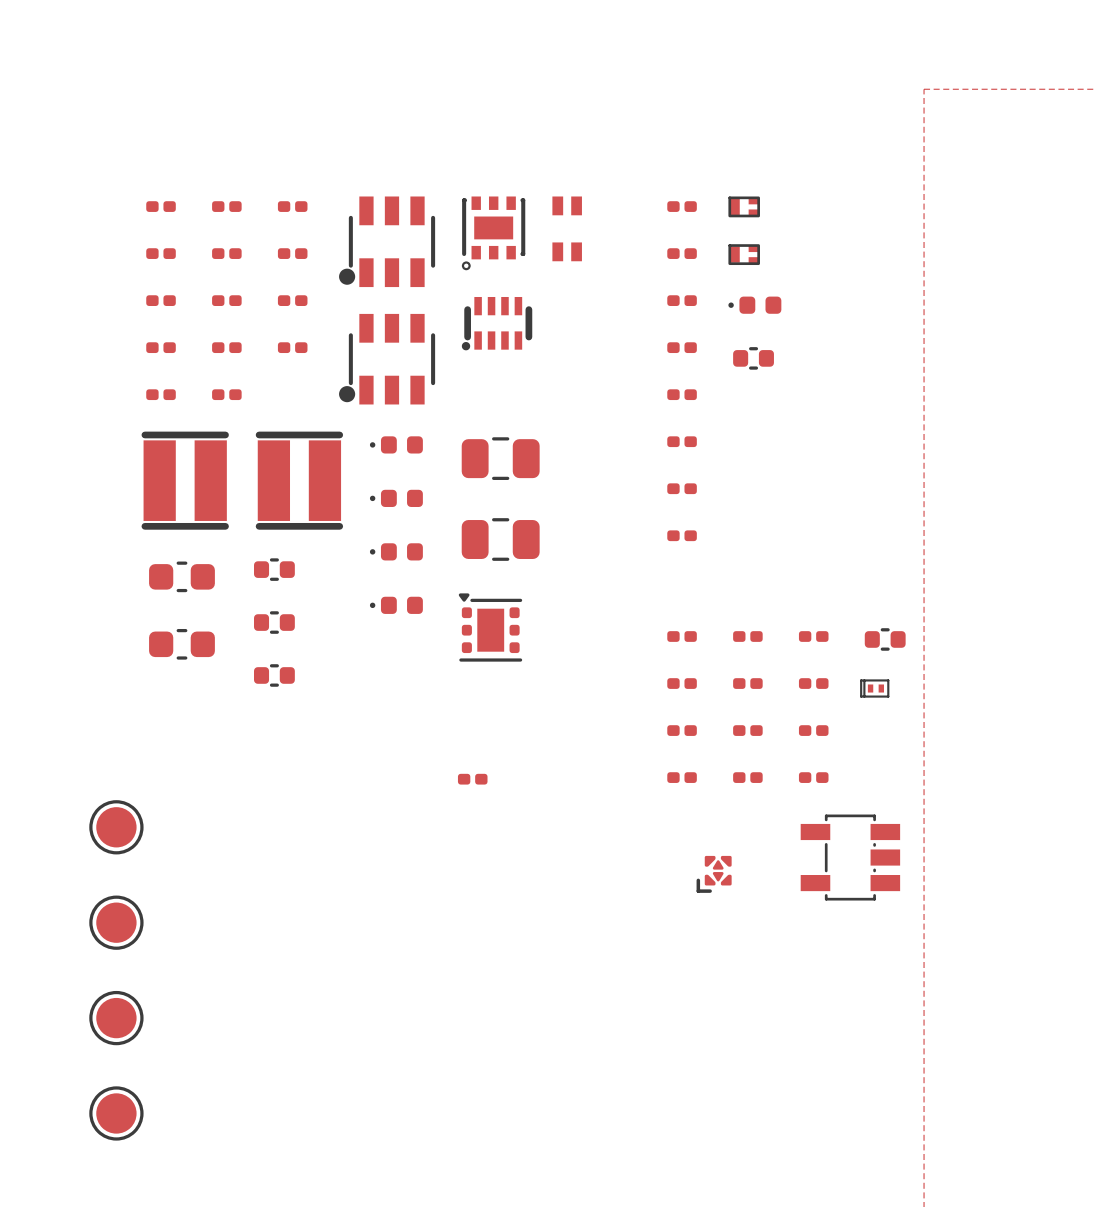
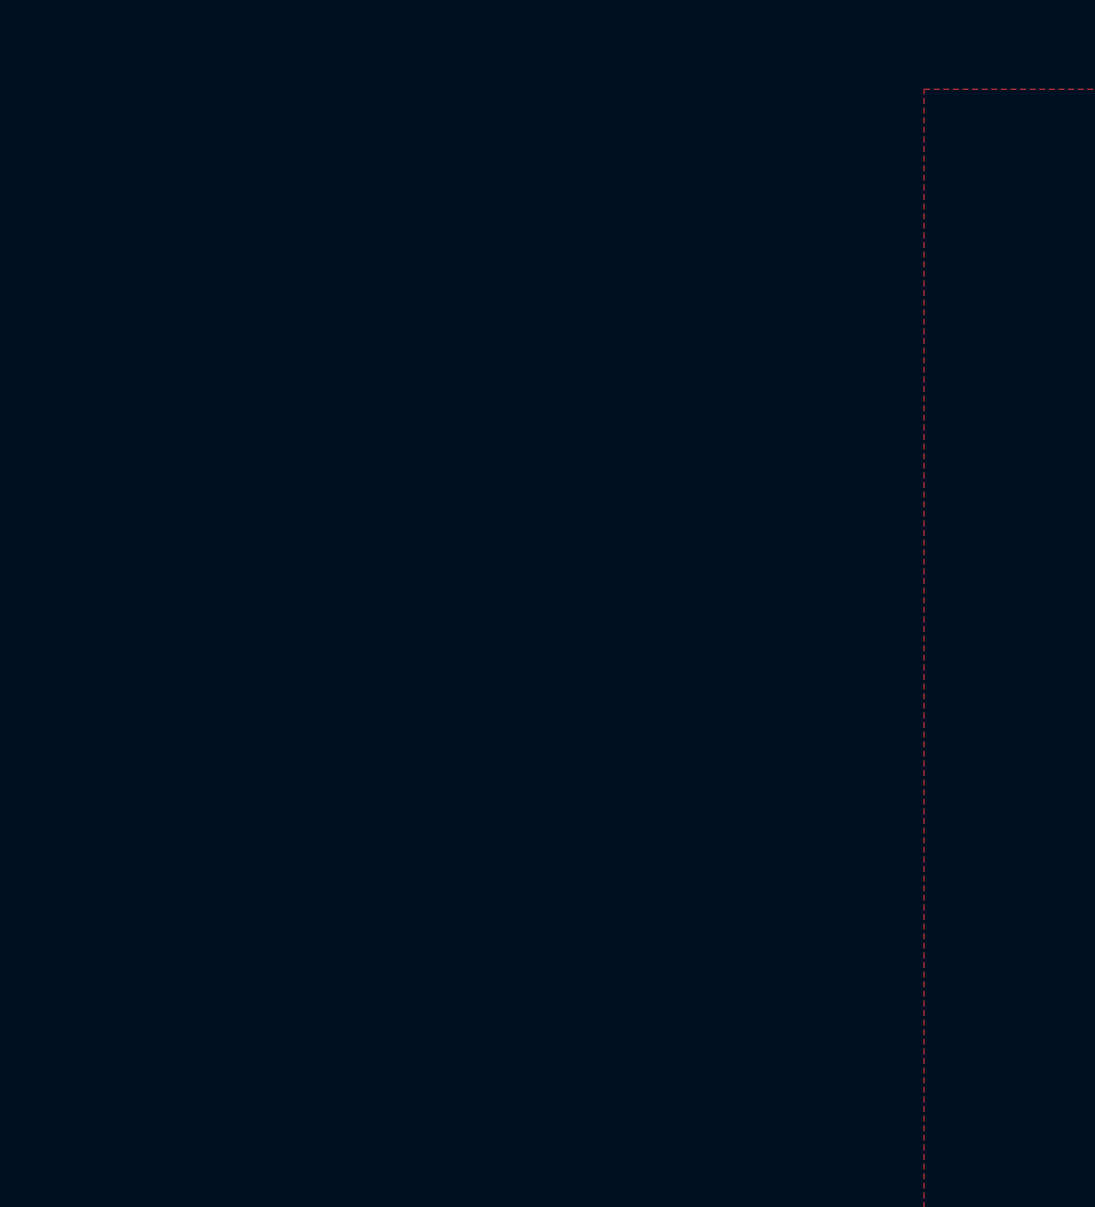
part: (567, 205) -> none
part: (161, 206) -> none
part: (226, 206) -> none
part: (292, 206) -> none
part: (682, 206) -> none
part: (744, 206) -> none
part: (493, 233) -> none
part: (387, 241) -> none
part: (567, 251) -> none
part: (161, 253) -> none
part: (226, 253) -> none
part: (292, 253) -> none
part: (682, 253) -> none
part: (744, 254) -> none
part: (161, 300) -> none
part: (226, 300) -> none
part: (292, 300) -> none
part: (682, 300) -> none
part: (754, 305) -> none
part: (497, 323) -> none
part: (161, 347) -> none
part: (226, 347) -> none
part: (292, 347) -> none
part: (682, 347) -> none
part: (753, 358) -> none
part: (387, 359) -> none
part: (161, 394) -> none
part: (226, 394) -> none
part: (682, 394) -> none
part: (682, 441) -> none
part: (396, 444) -> none
part: (500, 458) -> none
part: (185, 480) -> none
part: (299, 480) -> none
part: (682, 488) -> none
part: (396, 498) -> none
part: (682, 535) -> none
part: (500, 539) -> none
part: (396, 551) -> none
part: (274, 569) -> none
part: (181, 576) -> none
part: (396, 605) -> none
part: (274, 622) -> none
part: (490, 627) -> none
part: (682, 636) -> none
part: (747, 636) -> none
part: (813, 636) -> none
part: (885, 639) -> none
part: (181, 644) -> none
part: (274, 675) -> none
part: (682, 683) -> none
part: (747, 683) -> none
part: (813, 683) -> none
part: (874, 688) -> none
part: (682, 730) -> none
part: (747, 730) -> none
part: (813, 730) -> none
part: (682, 777) -> none
part: (747, 777) -> none
part: (813, 777) -> none
part: (472, 779) -> none
part: (116, 827) -> none
part: (850, 857) -> none
part: (714, 874) -> none
part: (116, 922) -> none
part: (116, 1018) -> none
part: (116, 1113) -> none

